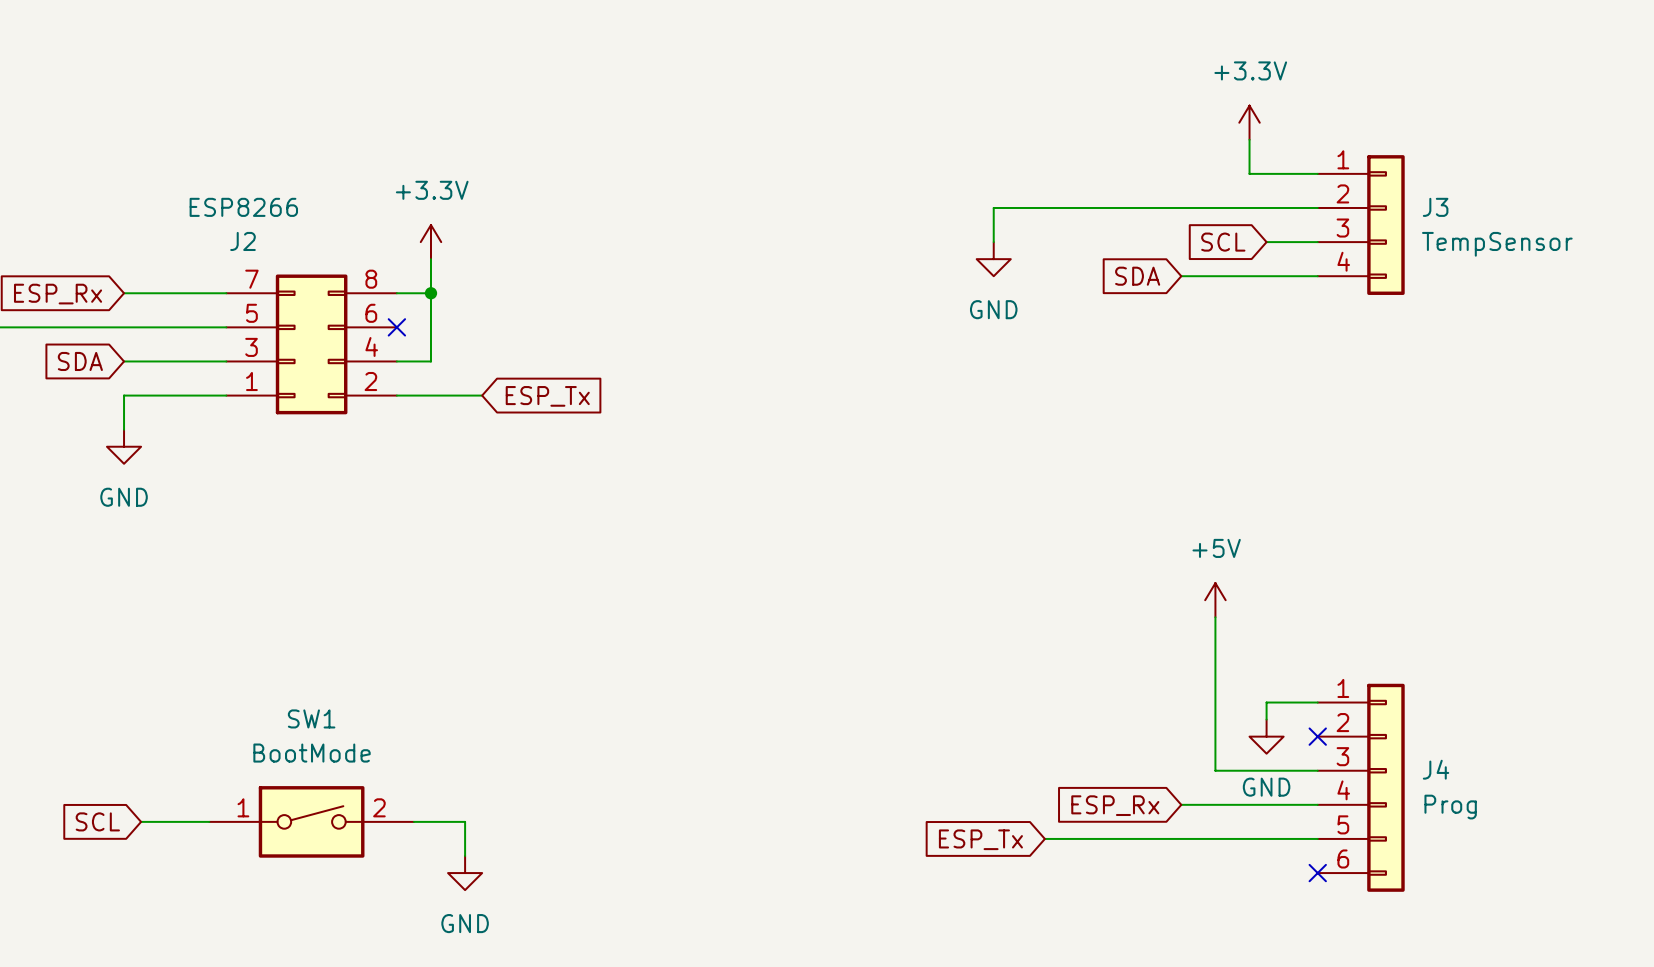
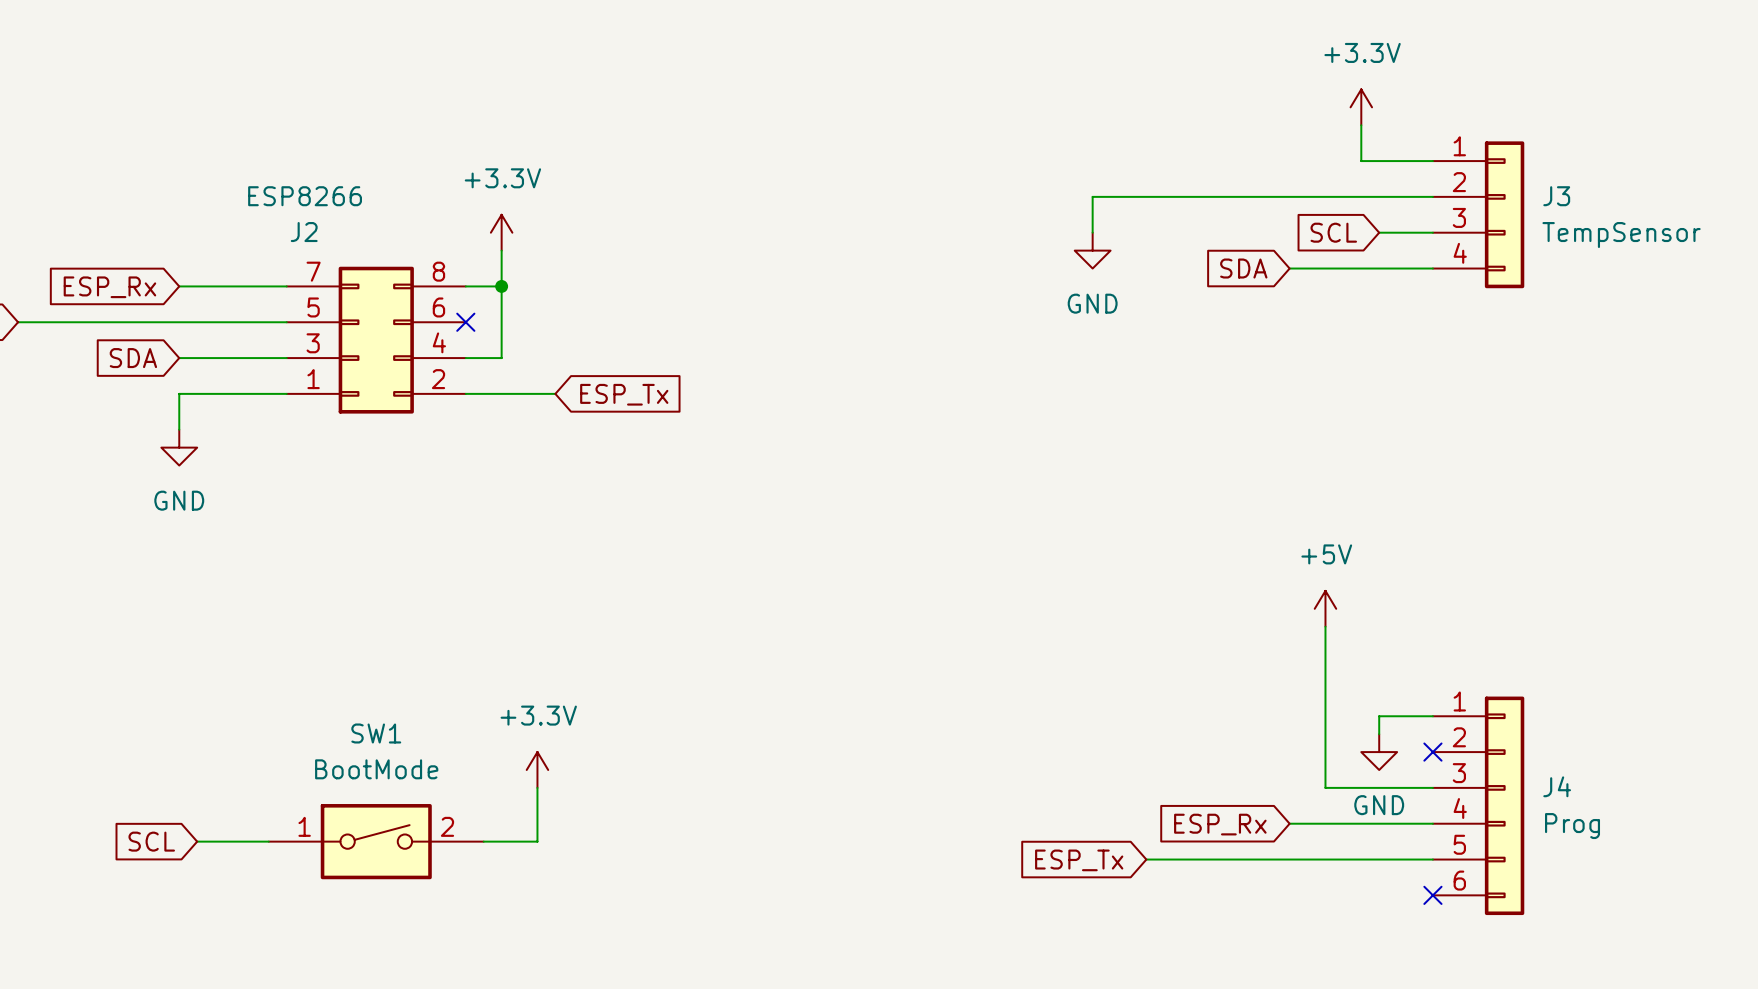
power symbol: none -> +3.3V (537, 769)
wire: (465, 821) (465, 856) -> (537, 841) (537, 787)
power symbol: GND (465, 873) -> none

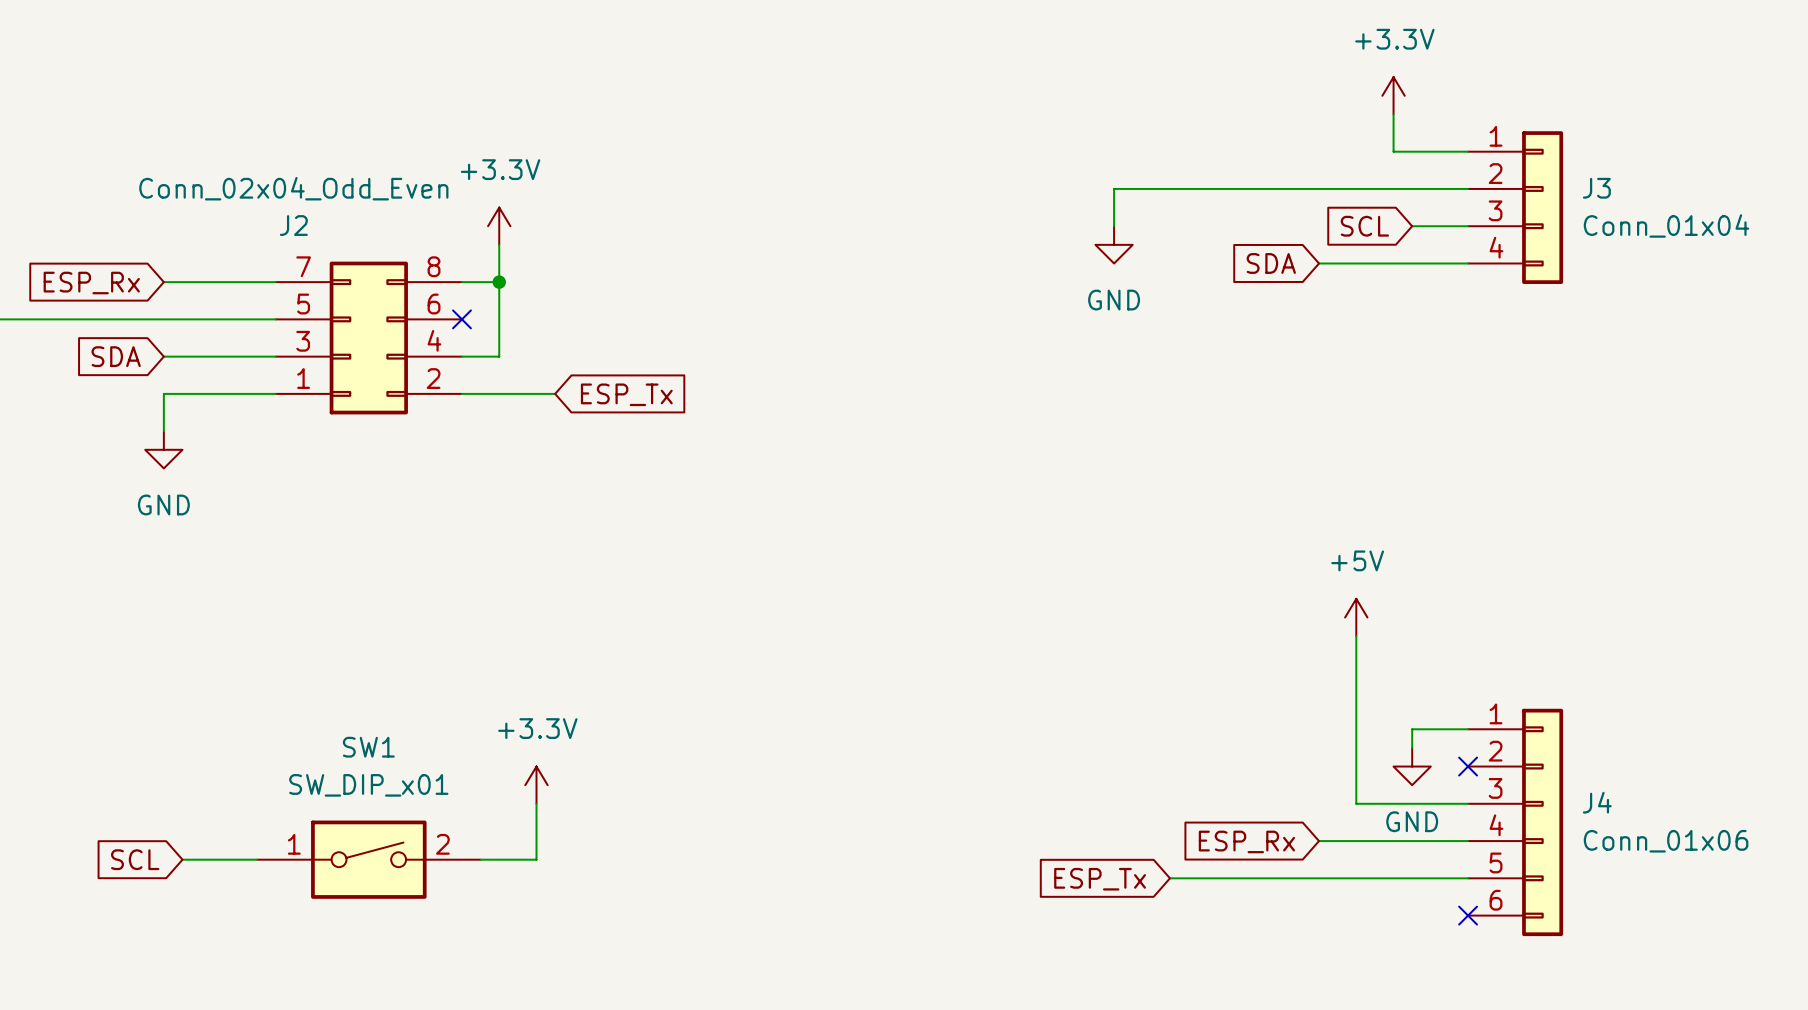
J2 value: ESP8266 (305, 196) -> Conn_02x04_Odd_Even (293, 188)
J3 value: TempSensor (1621, 235) -> Conn_01x04 (1666, 225)
SW1 value: BootMode (376, 769) -> SW_DIP_x01 (368, 785)
J4 value: Prog (1572, 826) -> Conn_01x06 (1666, 841)

